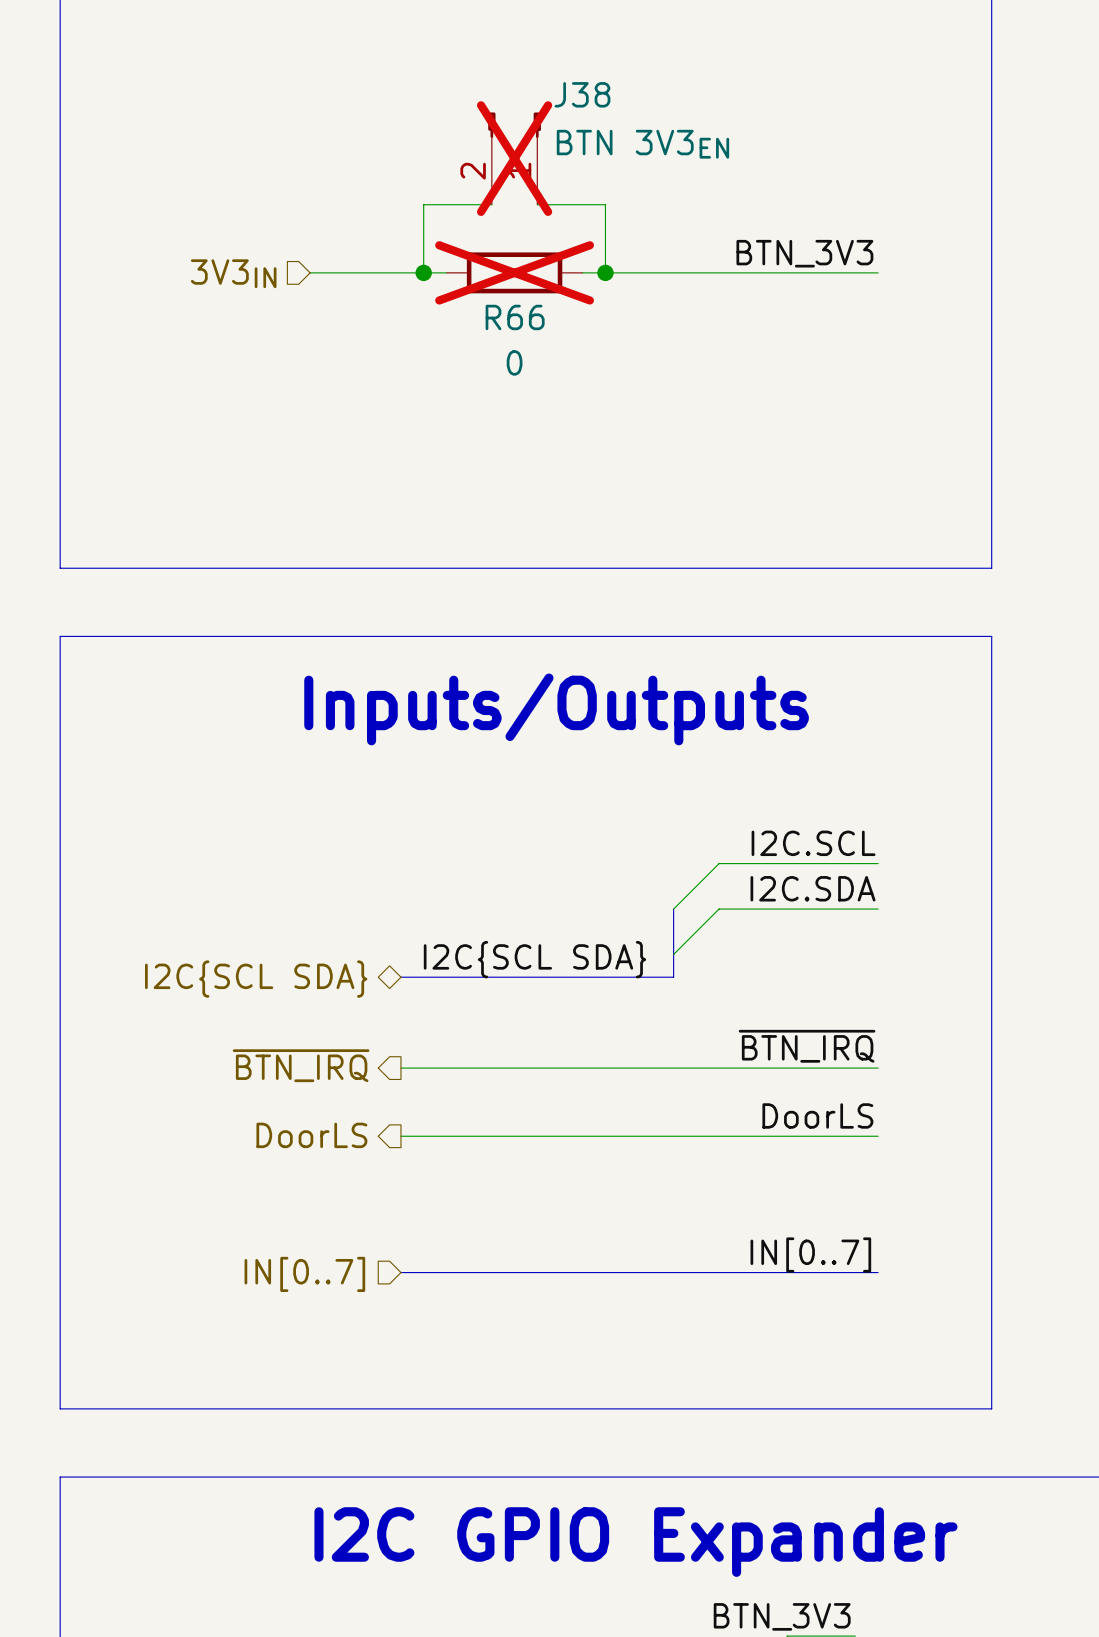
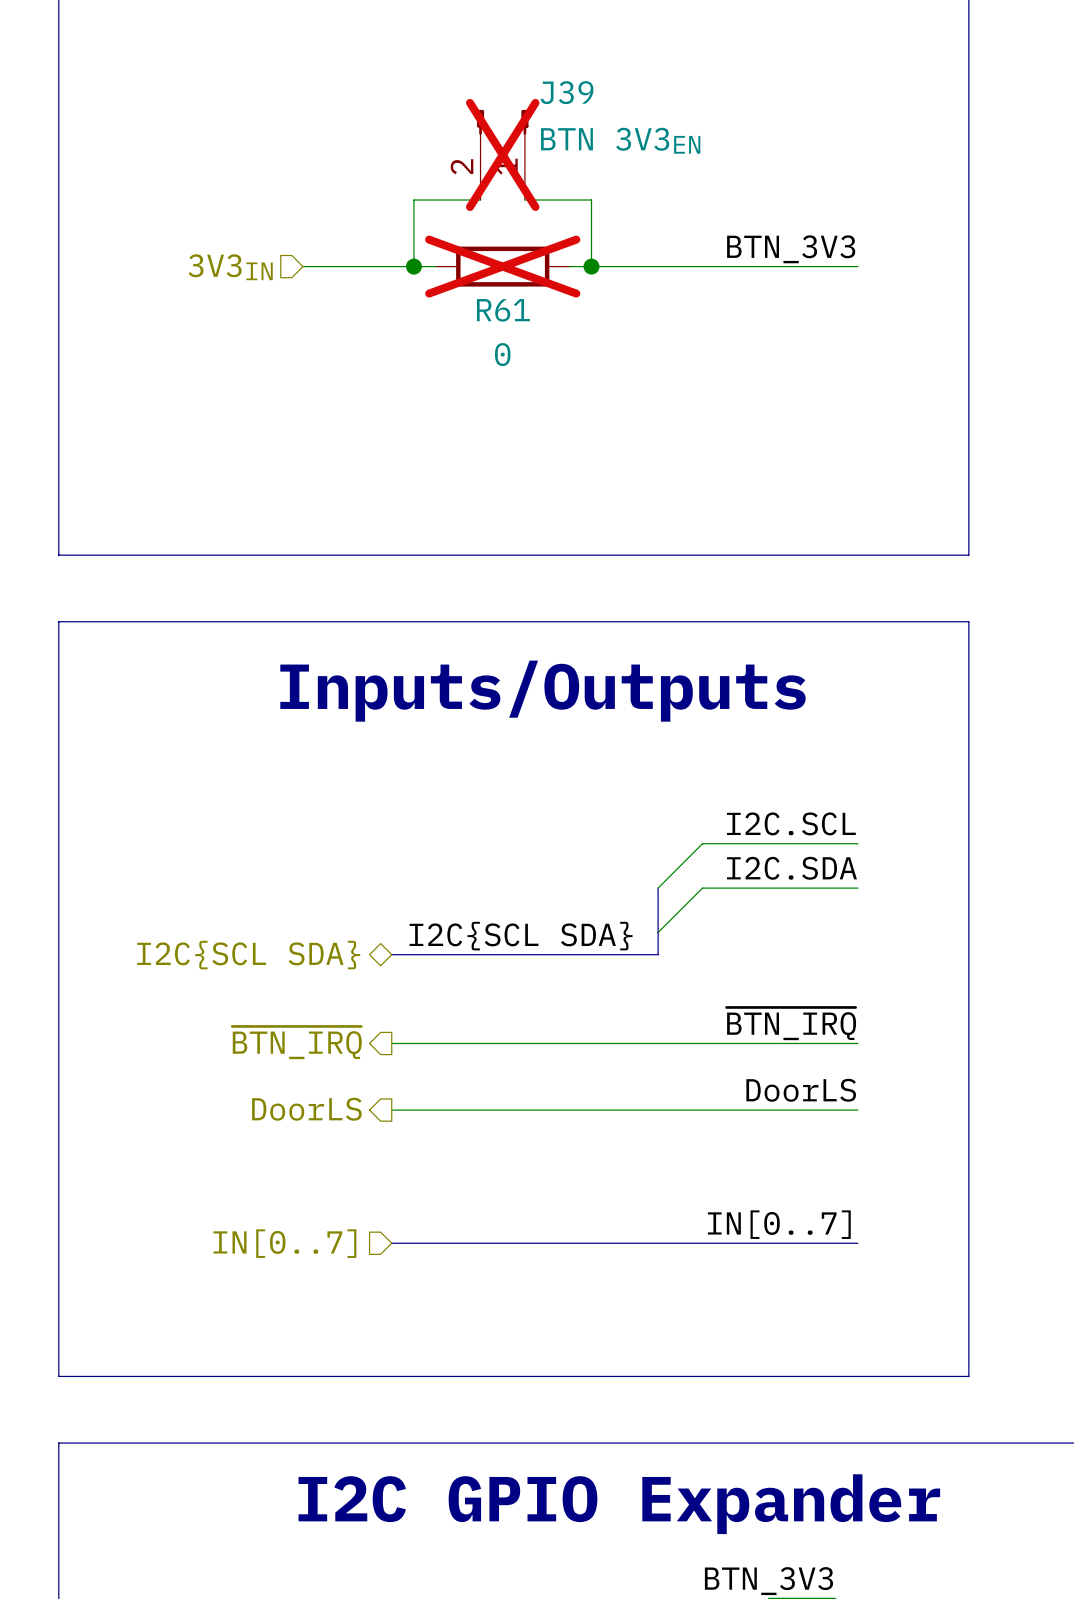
J38 name: J38 (582, 94) -> J39 (567, 92)
R66 name: R66 (515, 317) -> R61 (503, 310)

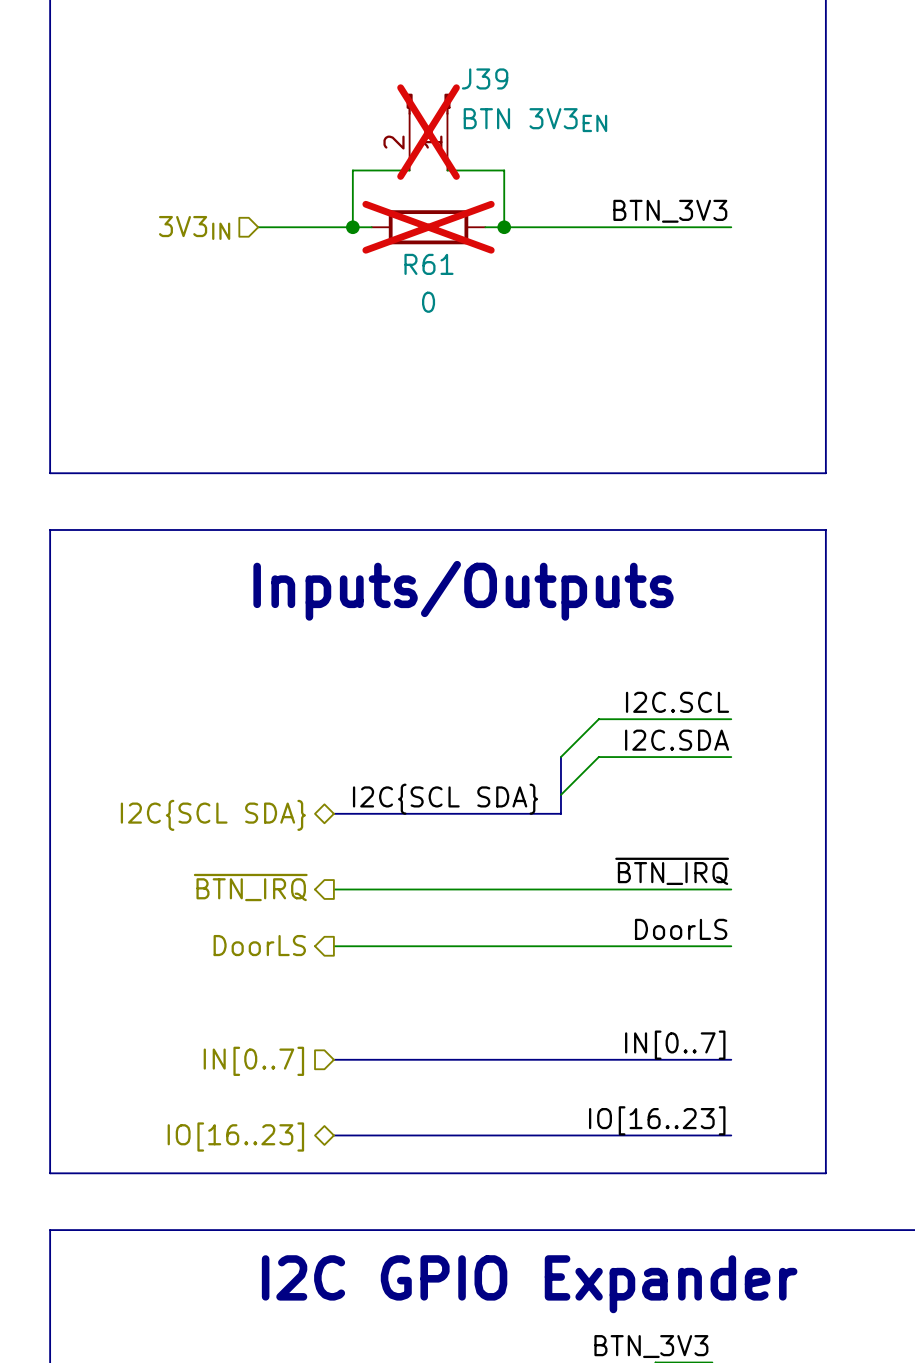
label: none -> IO[16..23] (657, 1120)
hierarchical label: none -> IO[16..23] (235, 1137)
bus: none -> (333, 1135) (731, 1135)

